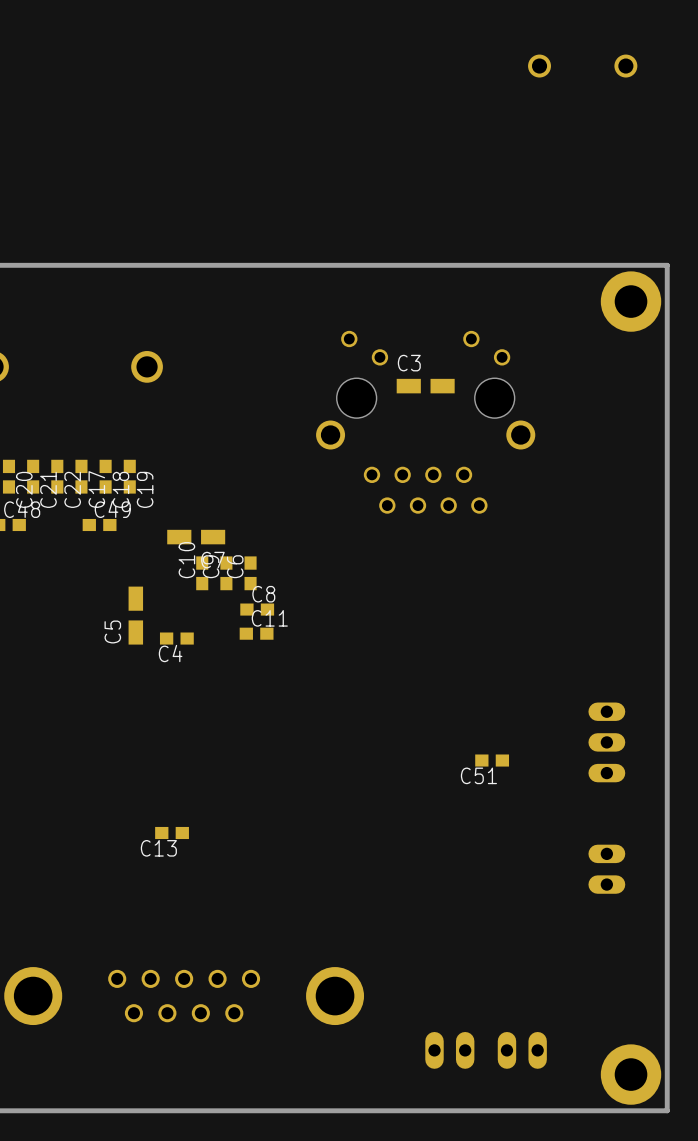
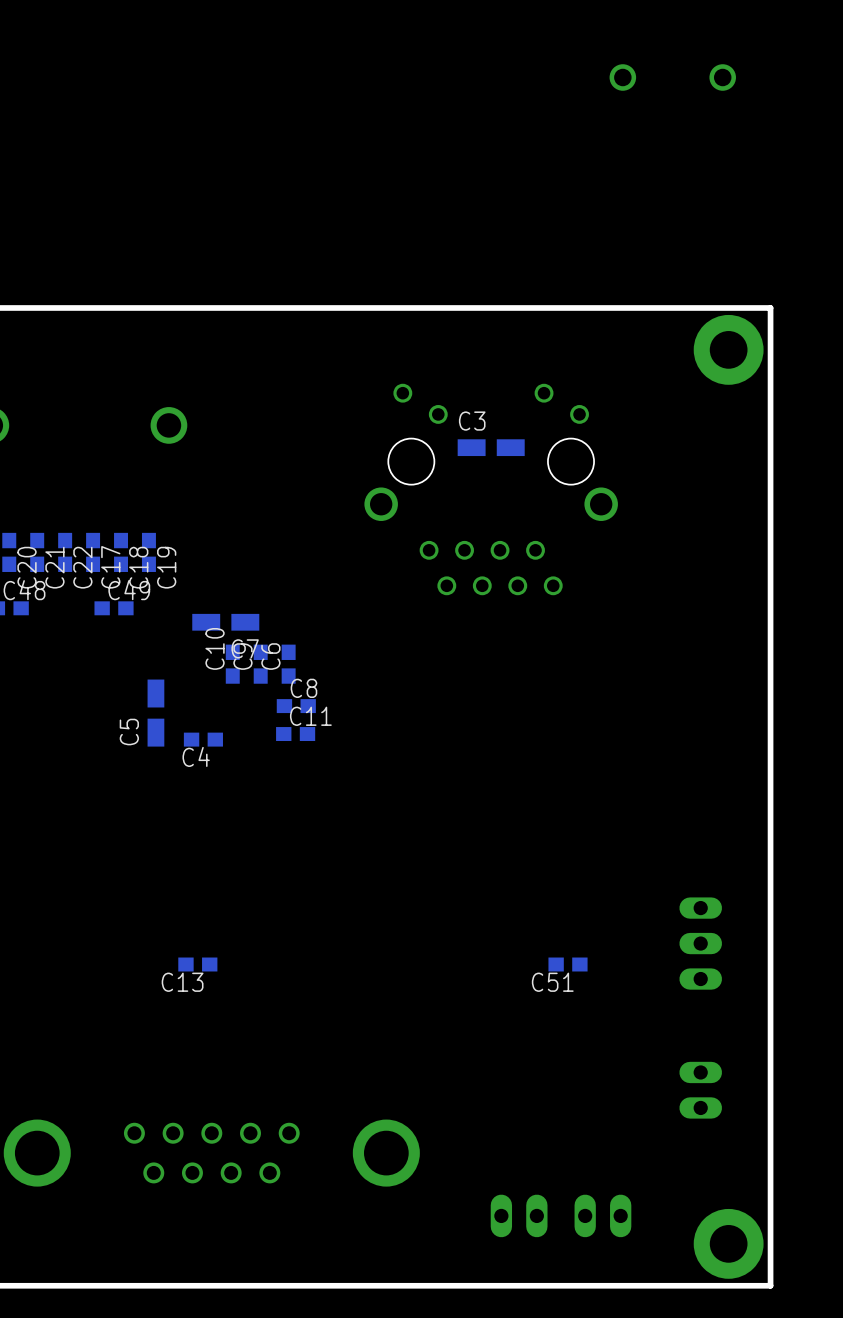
part position: (606, 742) -> (700, 943)
C51 position: (492, 760) -> (568, 964)
part position: (606, 869) -> (700, 1090)

